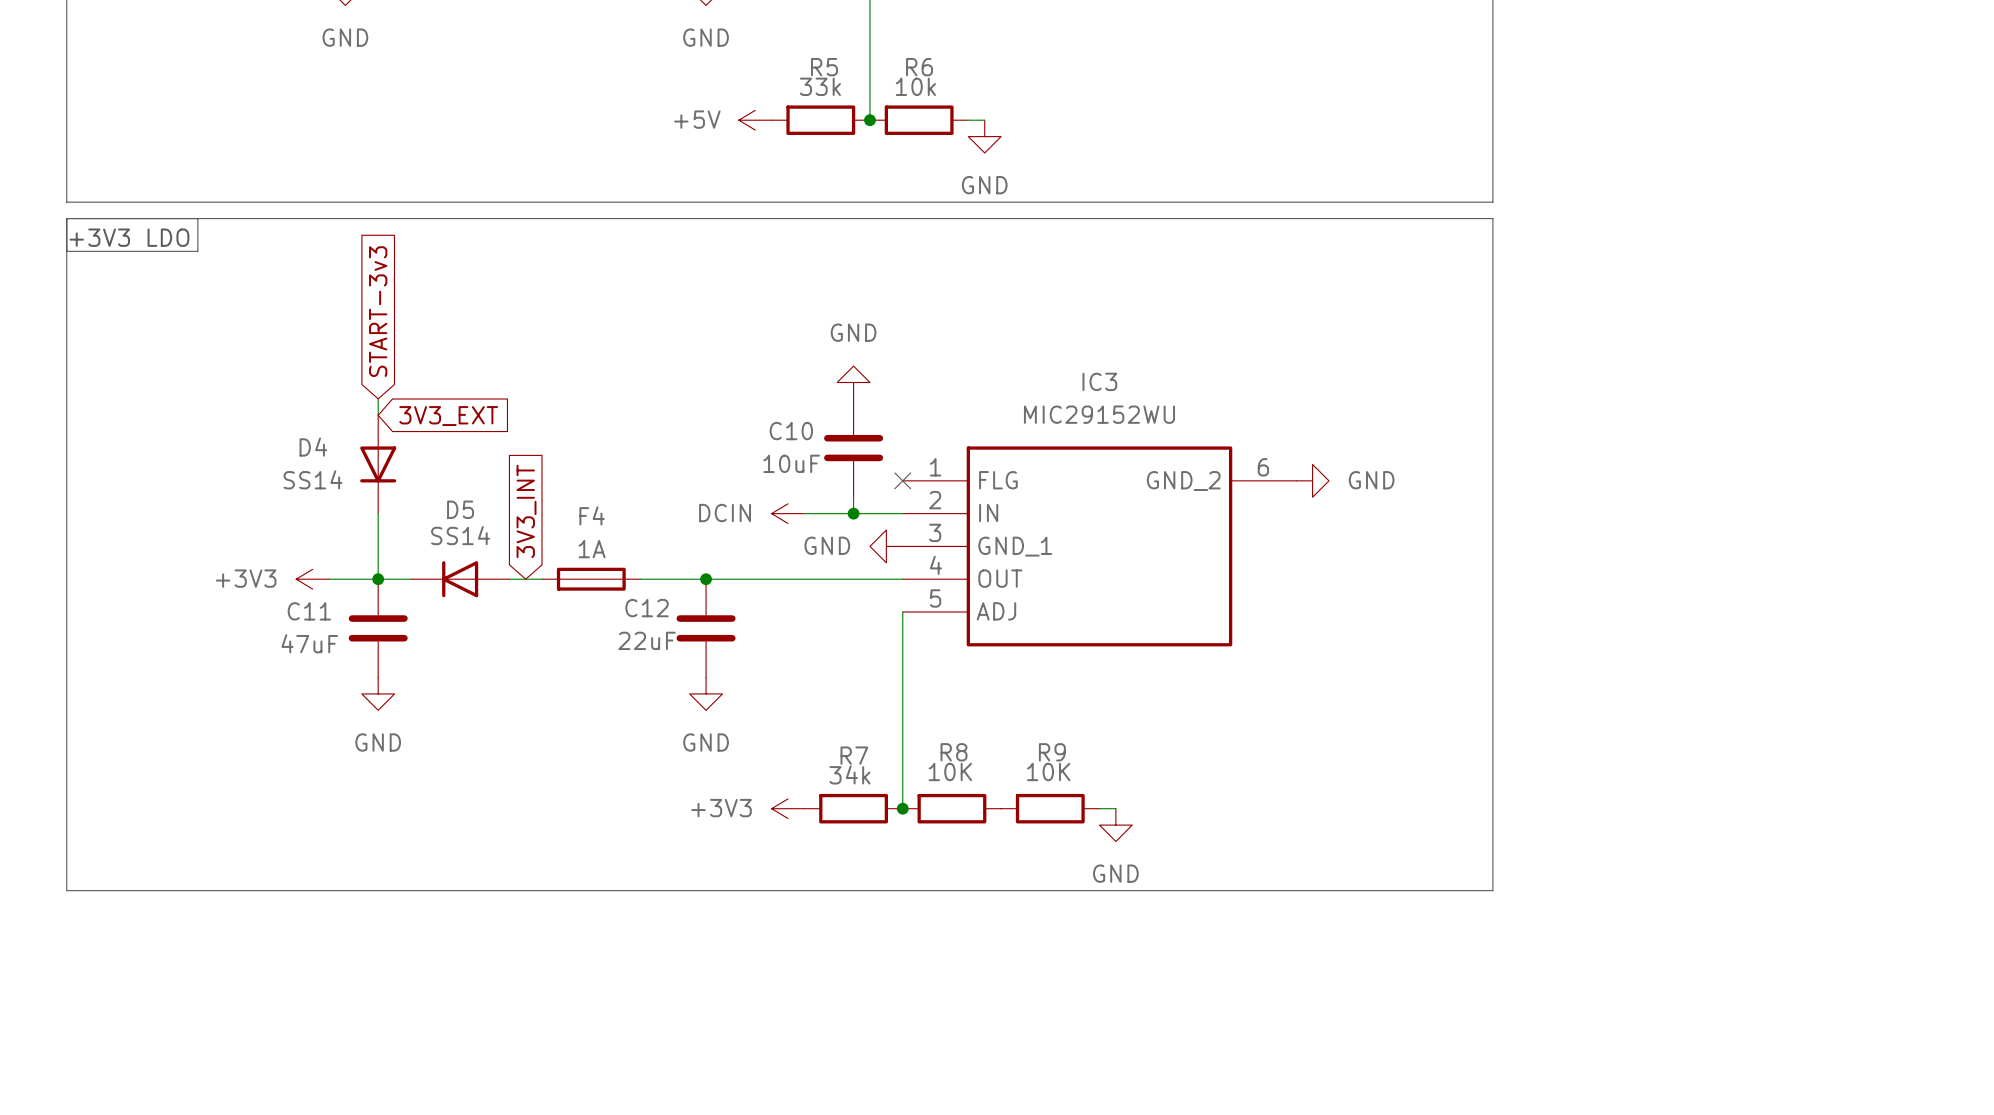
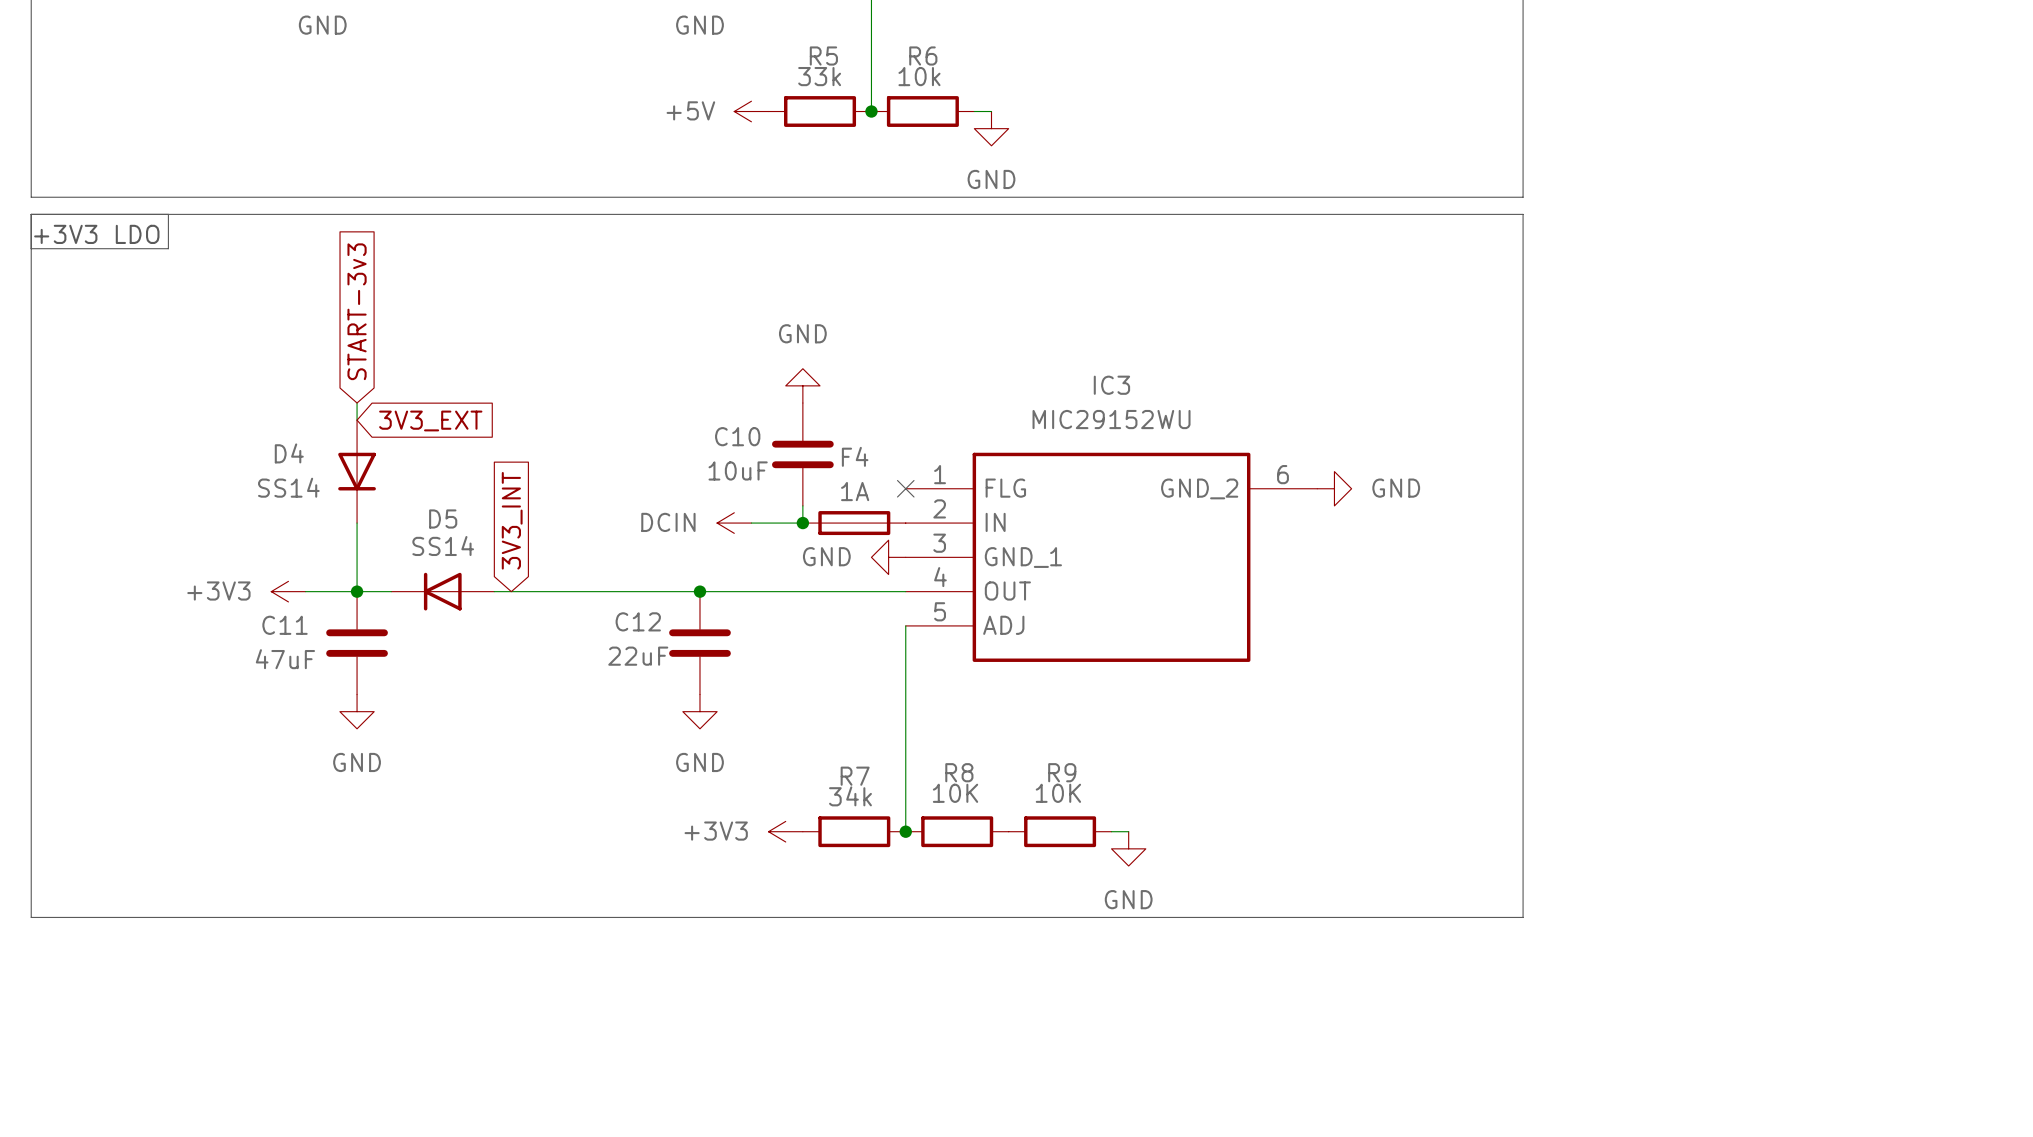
power symbol position: GND (853, 382) -> GND (802, 385)
C10 position: (853, 448) -> (802, 454)
wire: none -> (802, 505) (802, 523) (751, 523)
wire: (853, 497) (853, 513) -> none
power symbol position: DCIN (788, 513) -> DCIN (734, 523)
junction position: (853, 513) -> (802, 523)
F4 position: (591, 579) -> (854, 523)

